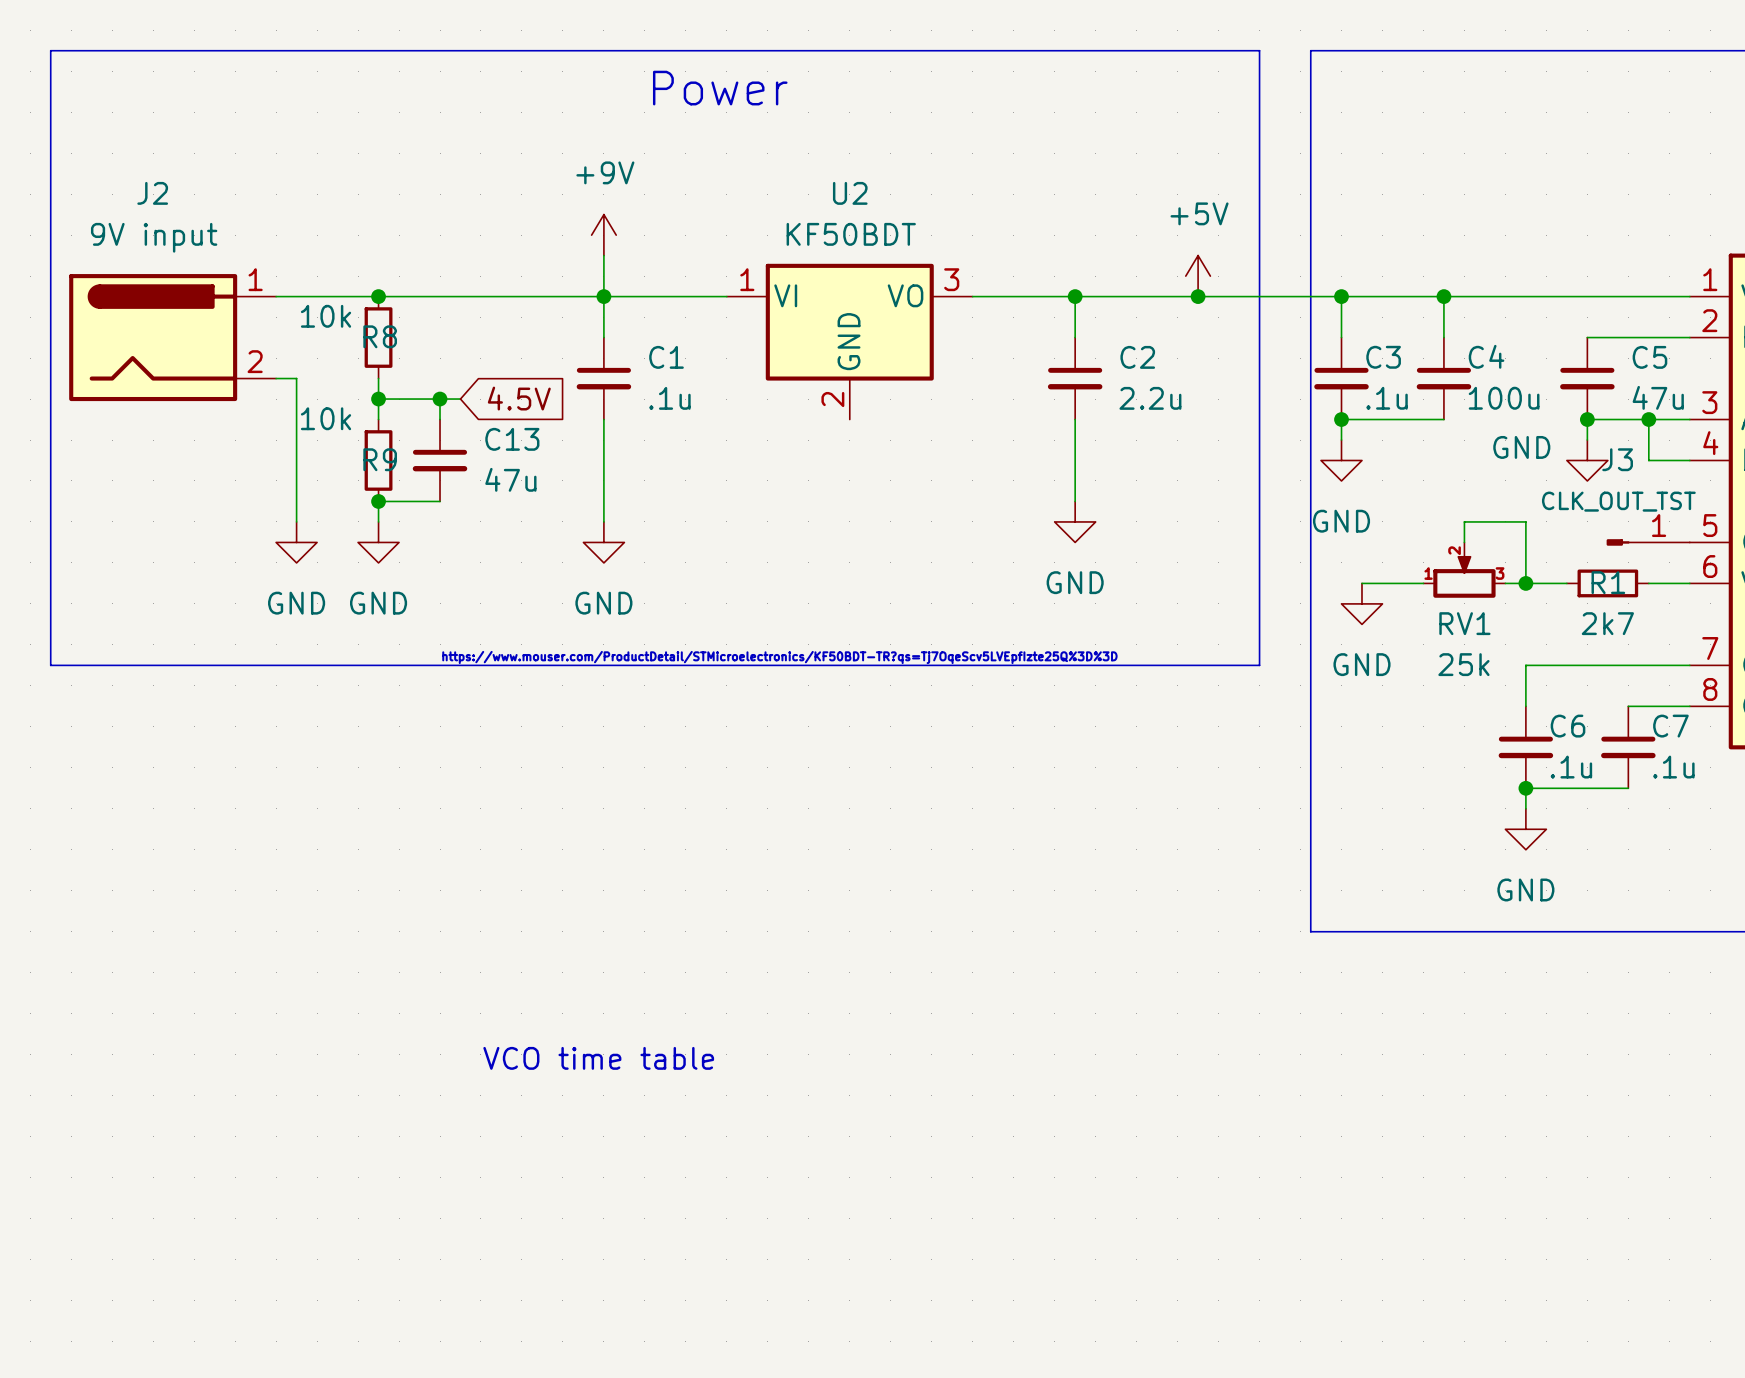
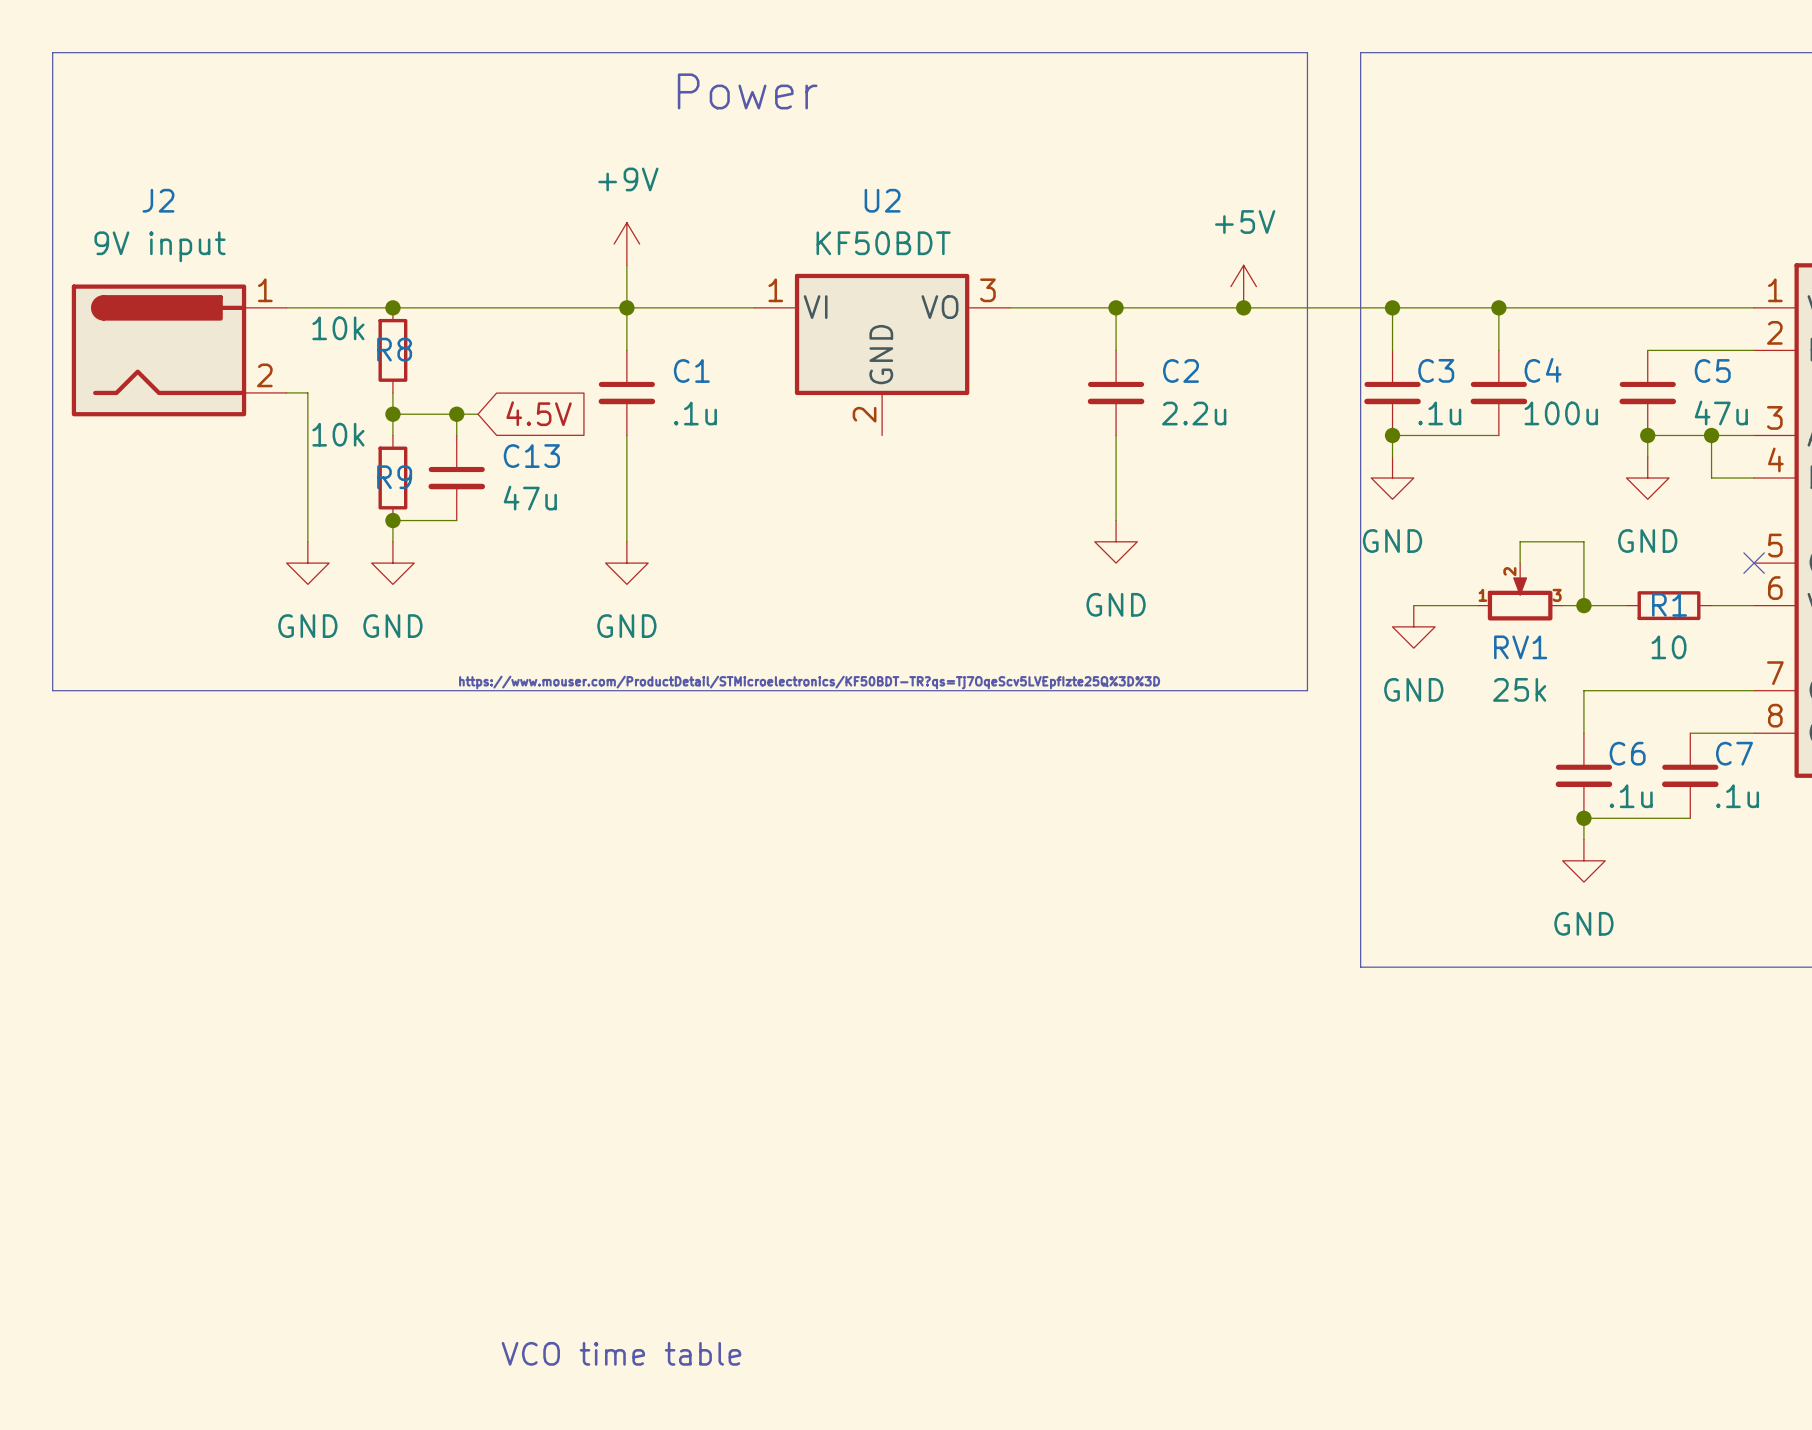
power symbol text position: GND (1521, 447) -> GND (1647, 541)
J3: CLK_OUT_TST (1648, 542) -> none
no-connect mark: none -> (1754, 563)
R1 value: 2k7 (1607, 623) -> 10 (1669, 647)
text position: VCO time table (598, 1058) -> VCO time table (621, 1353)

